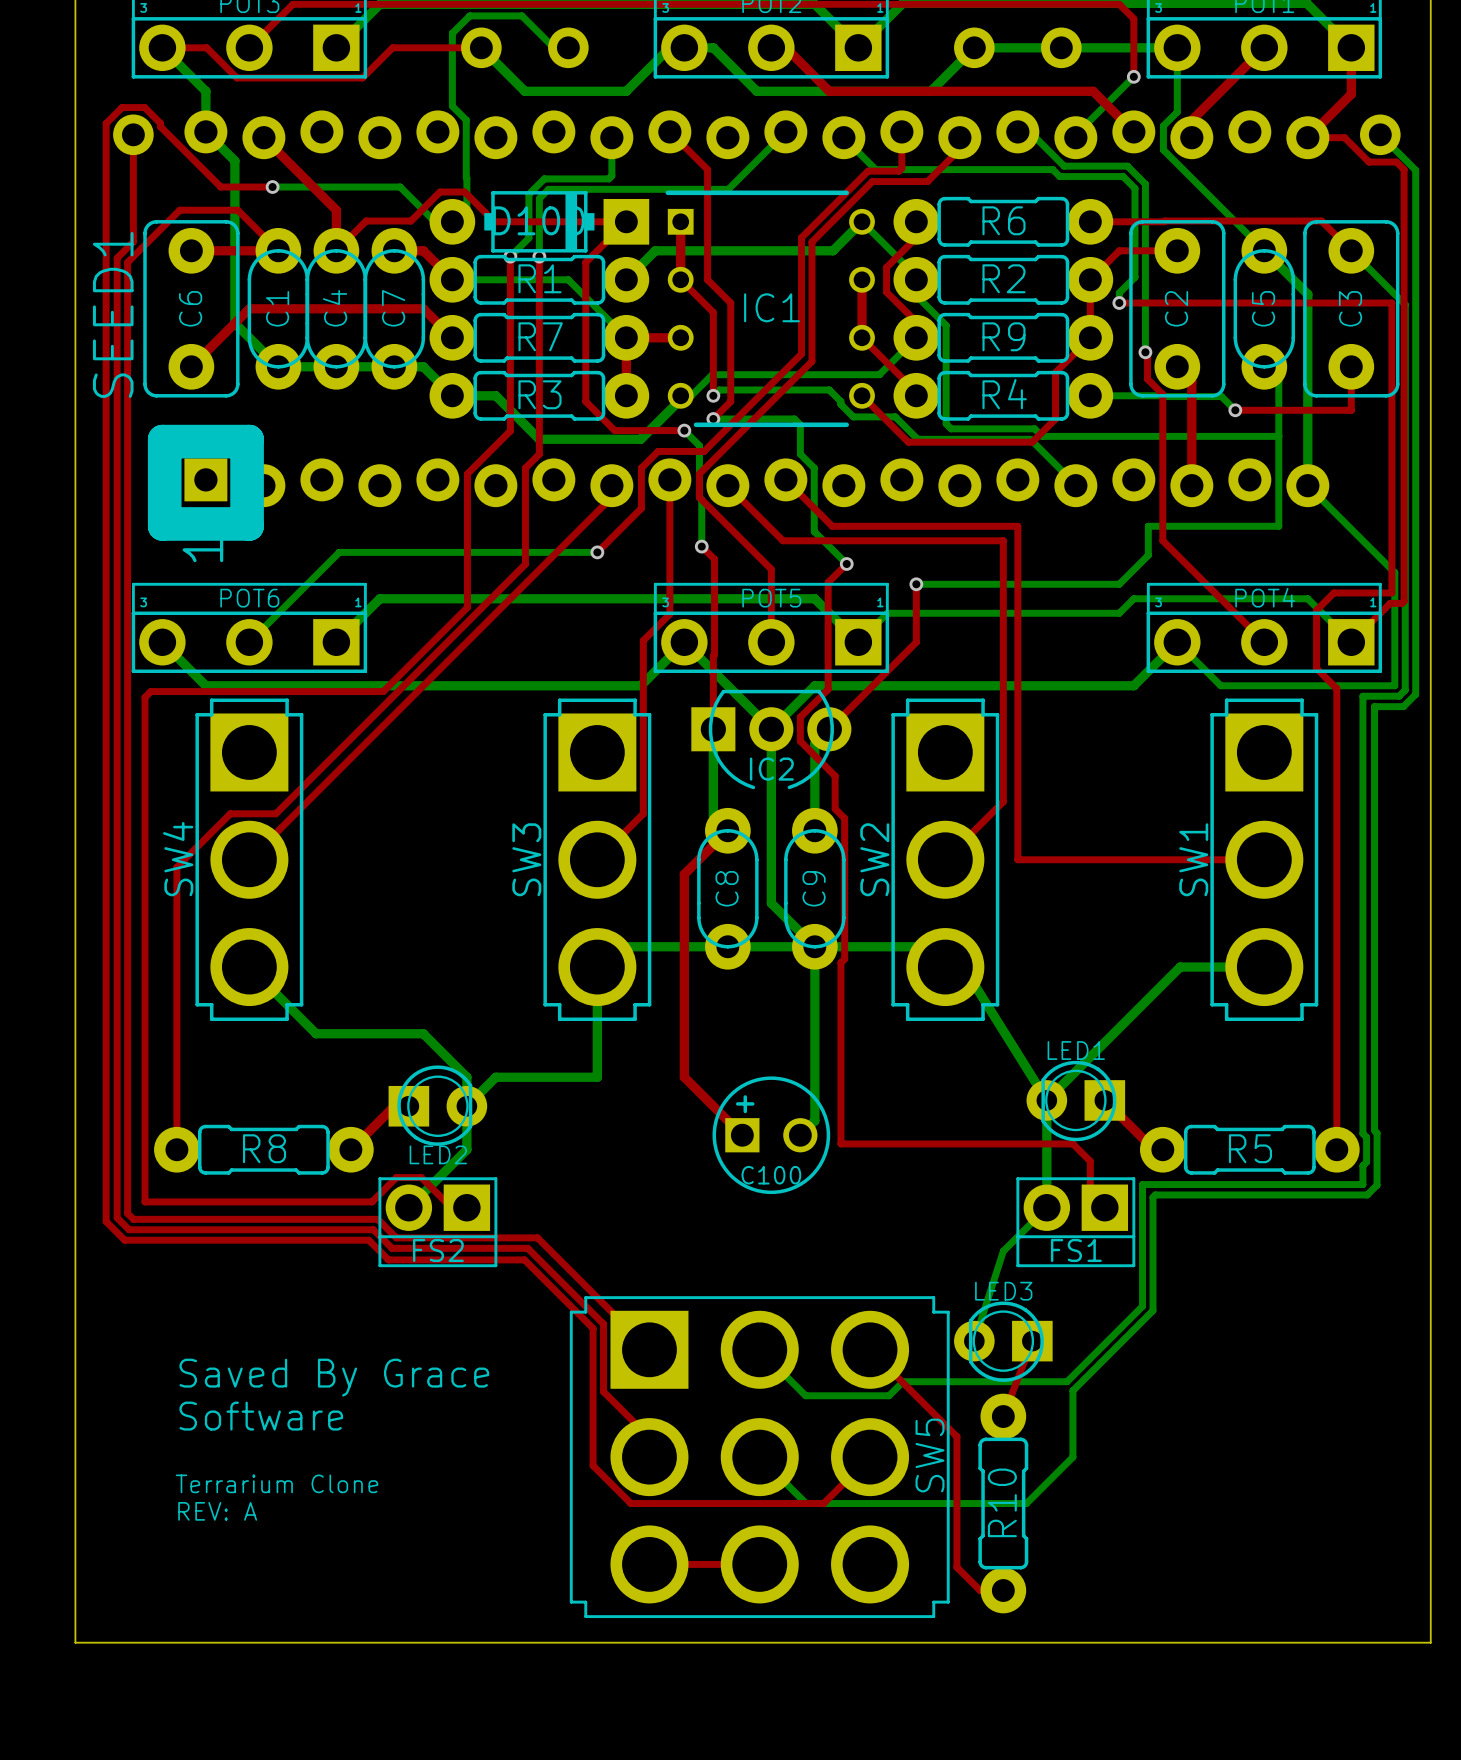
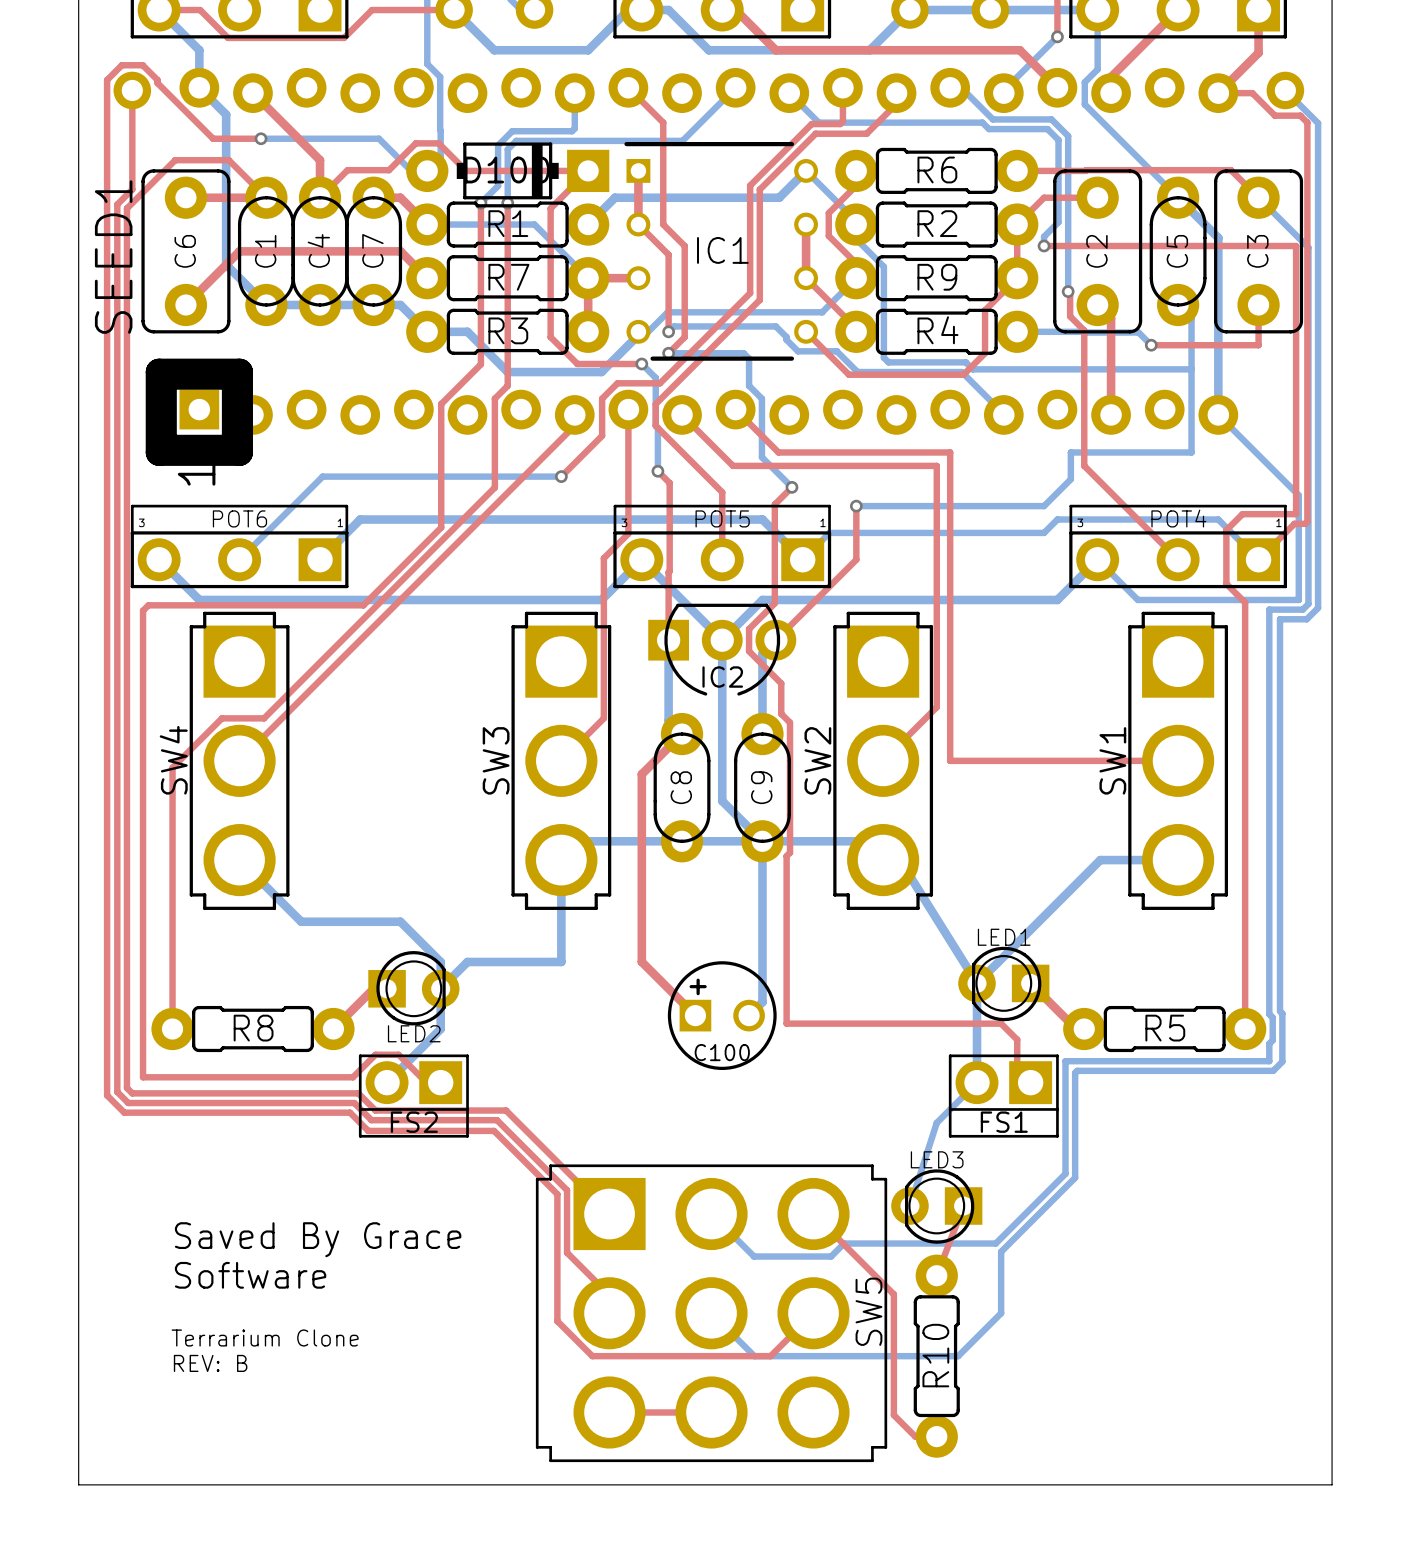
text: REV: A (217, 1511) -> REV: B (210, 1363)

